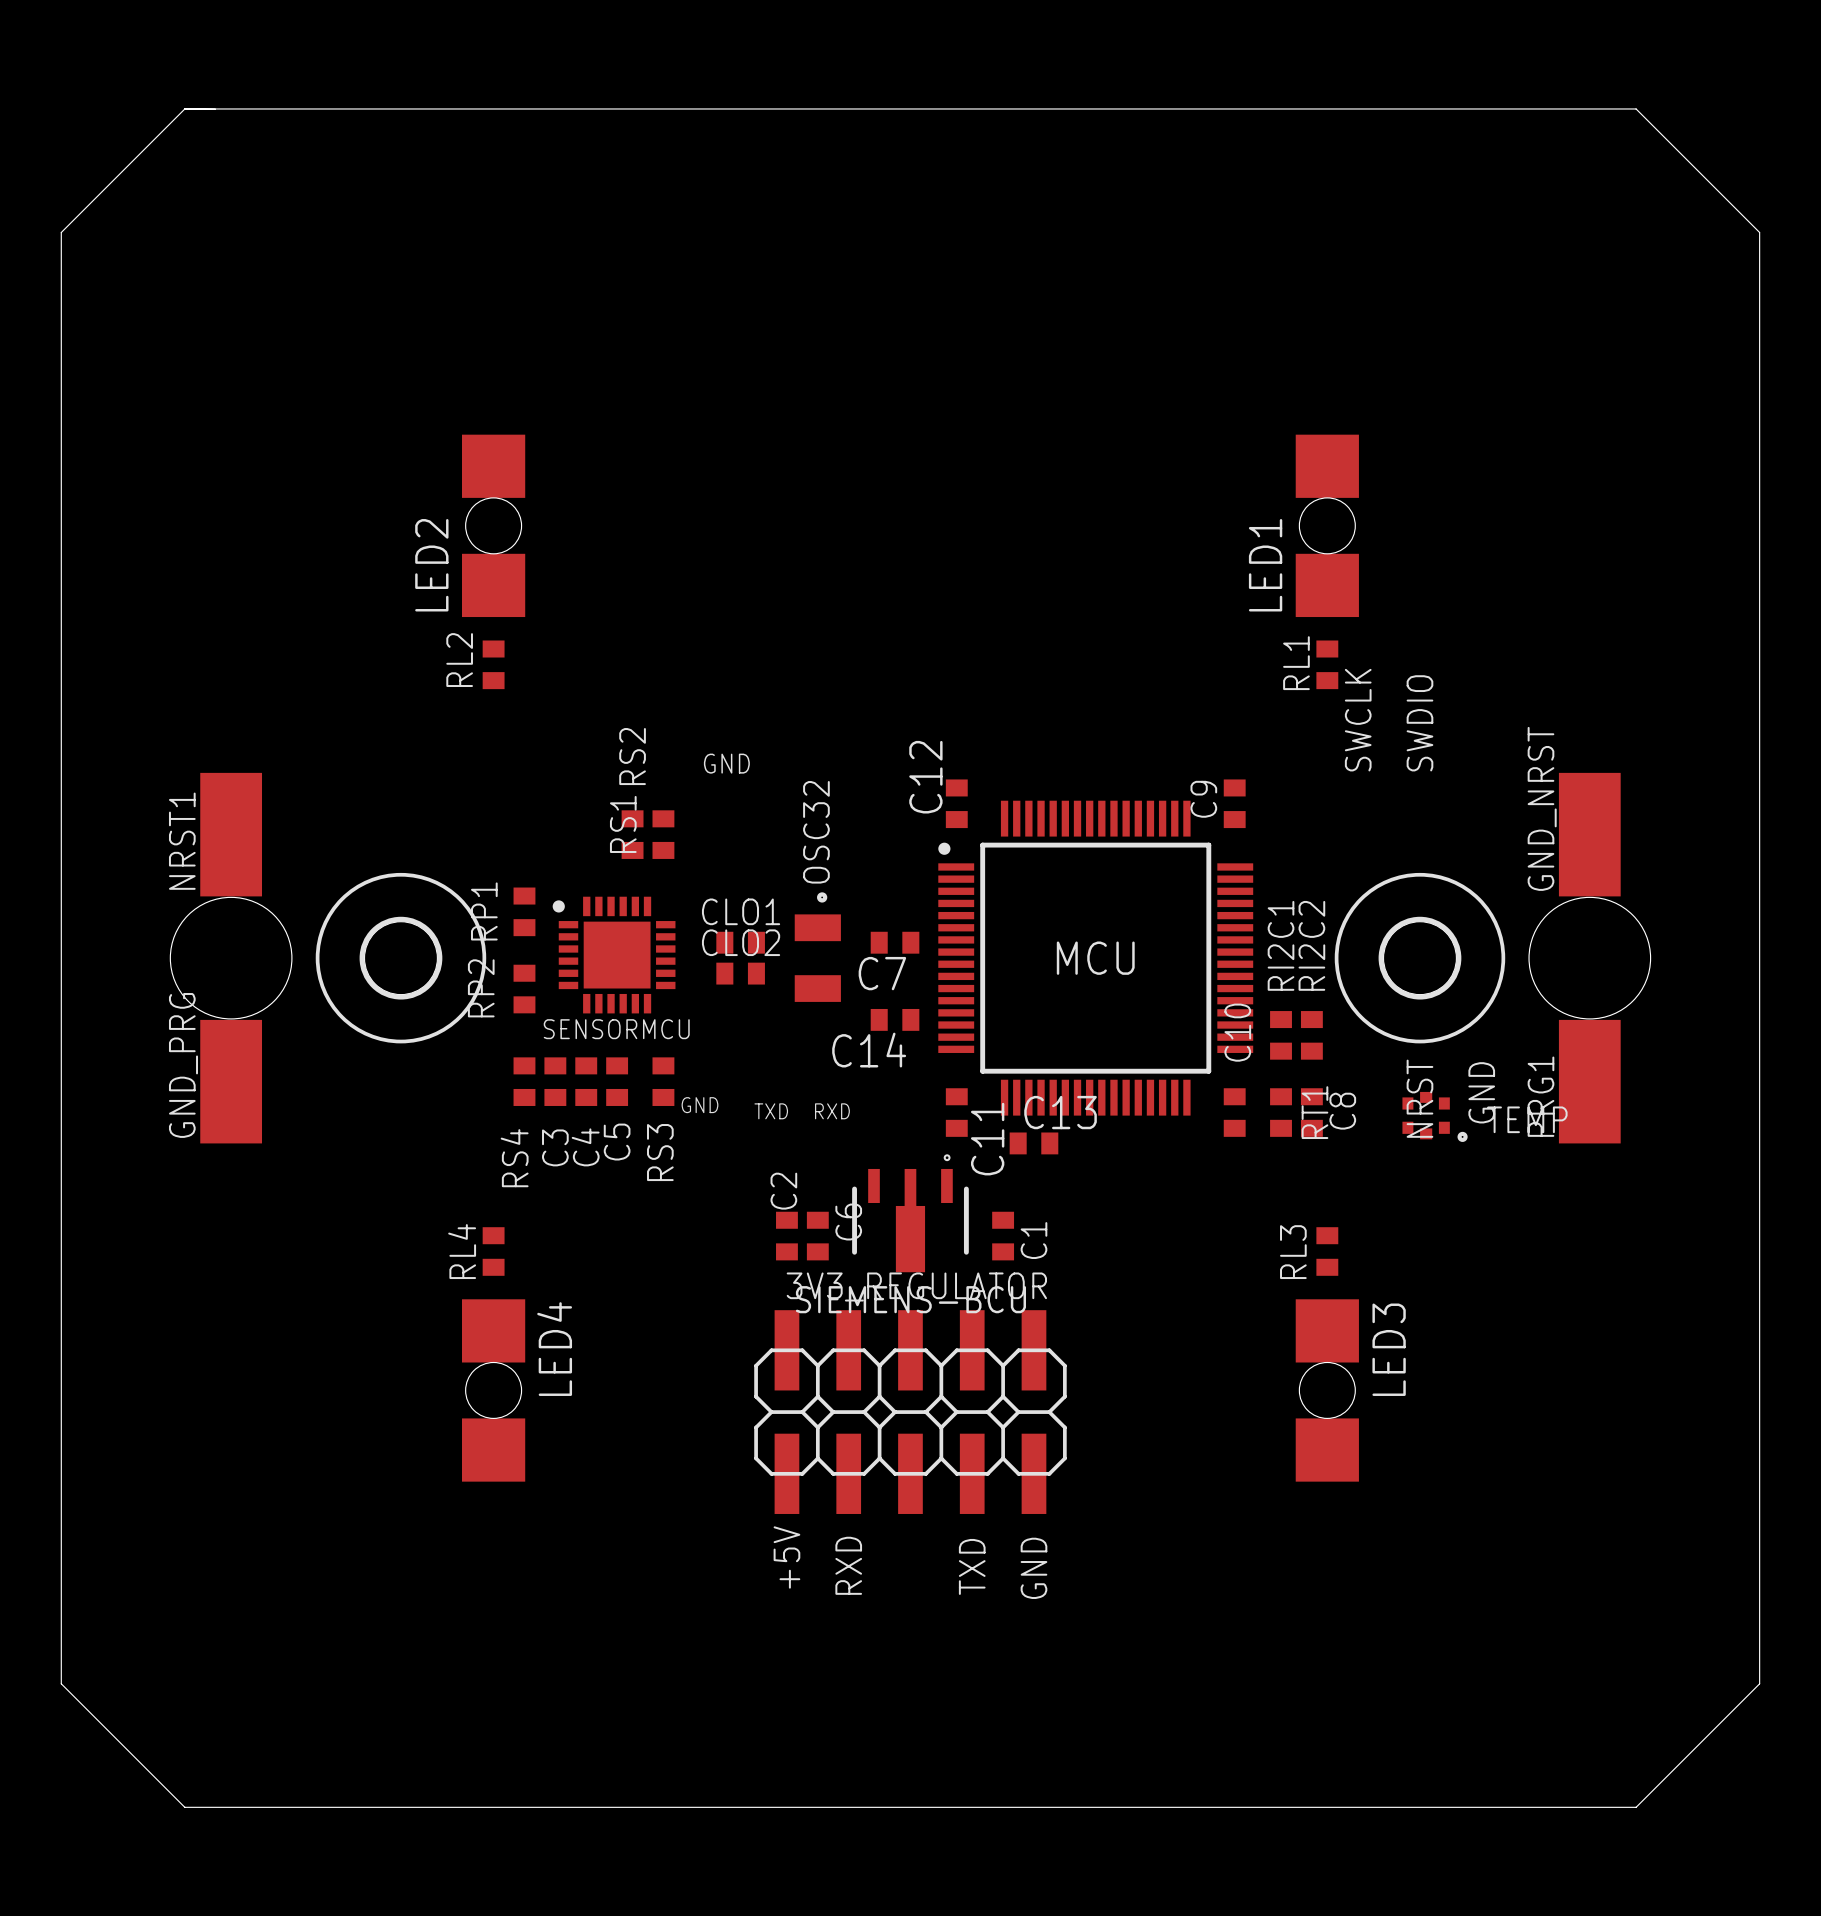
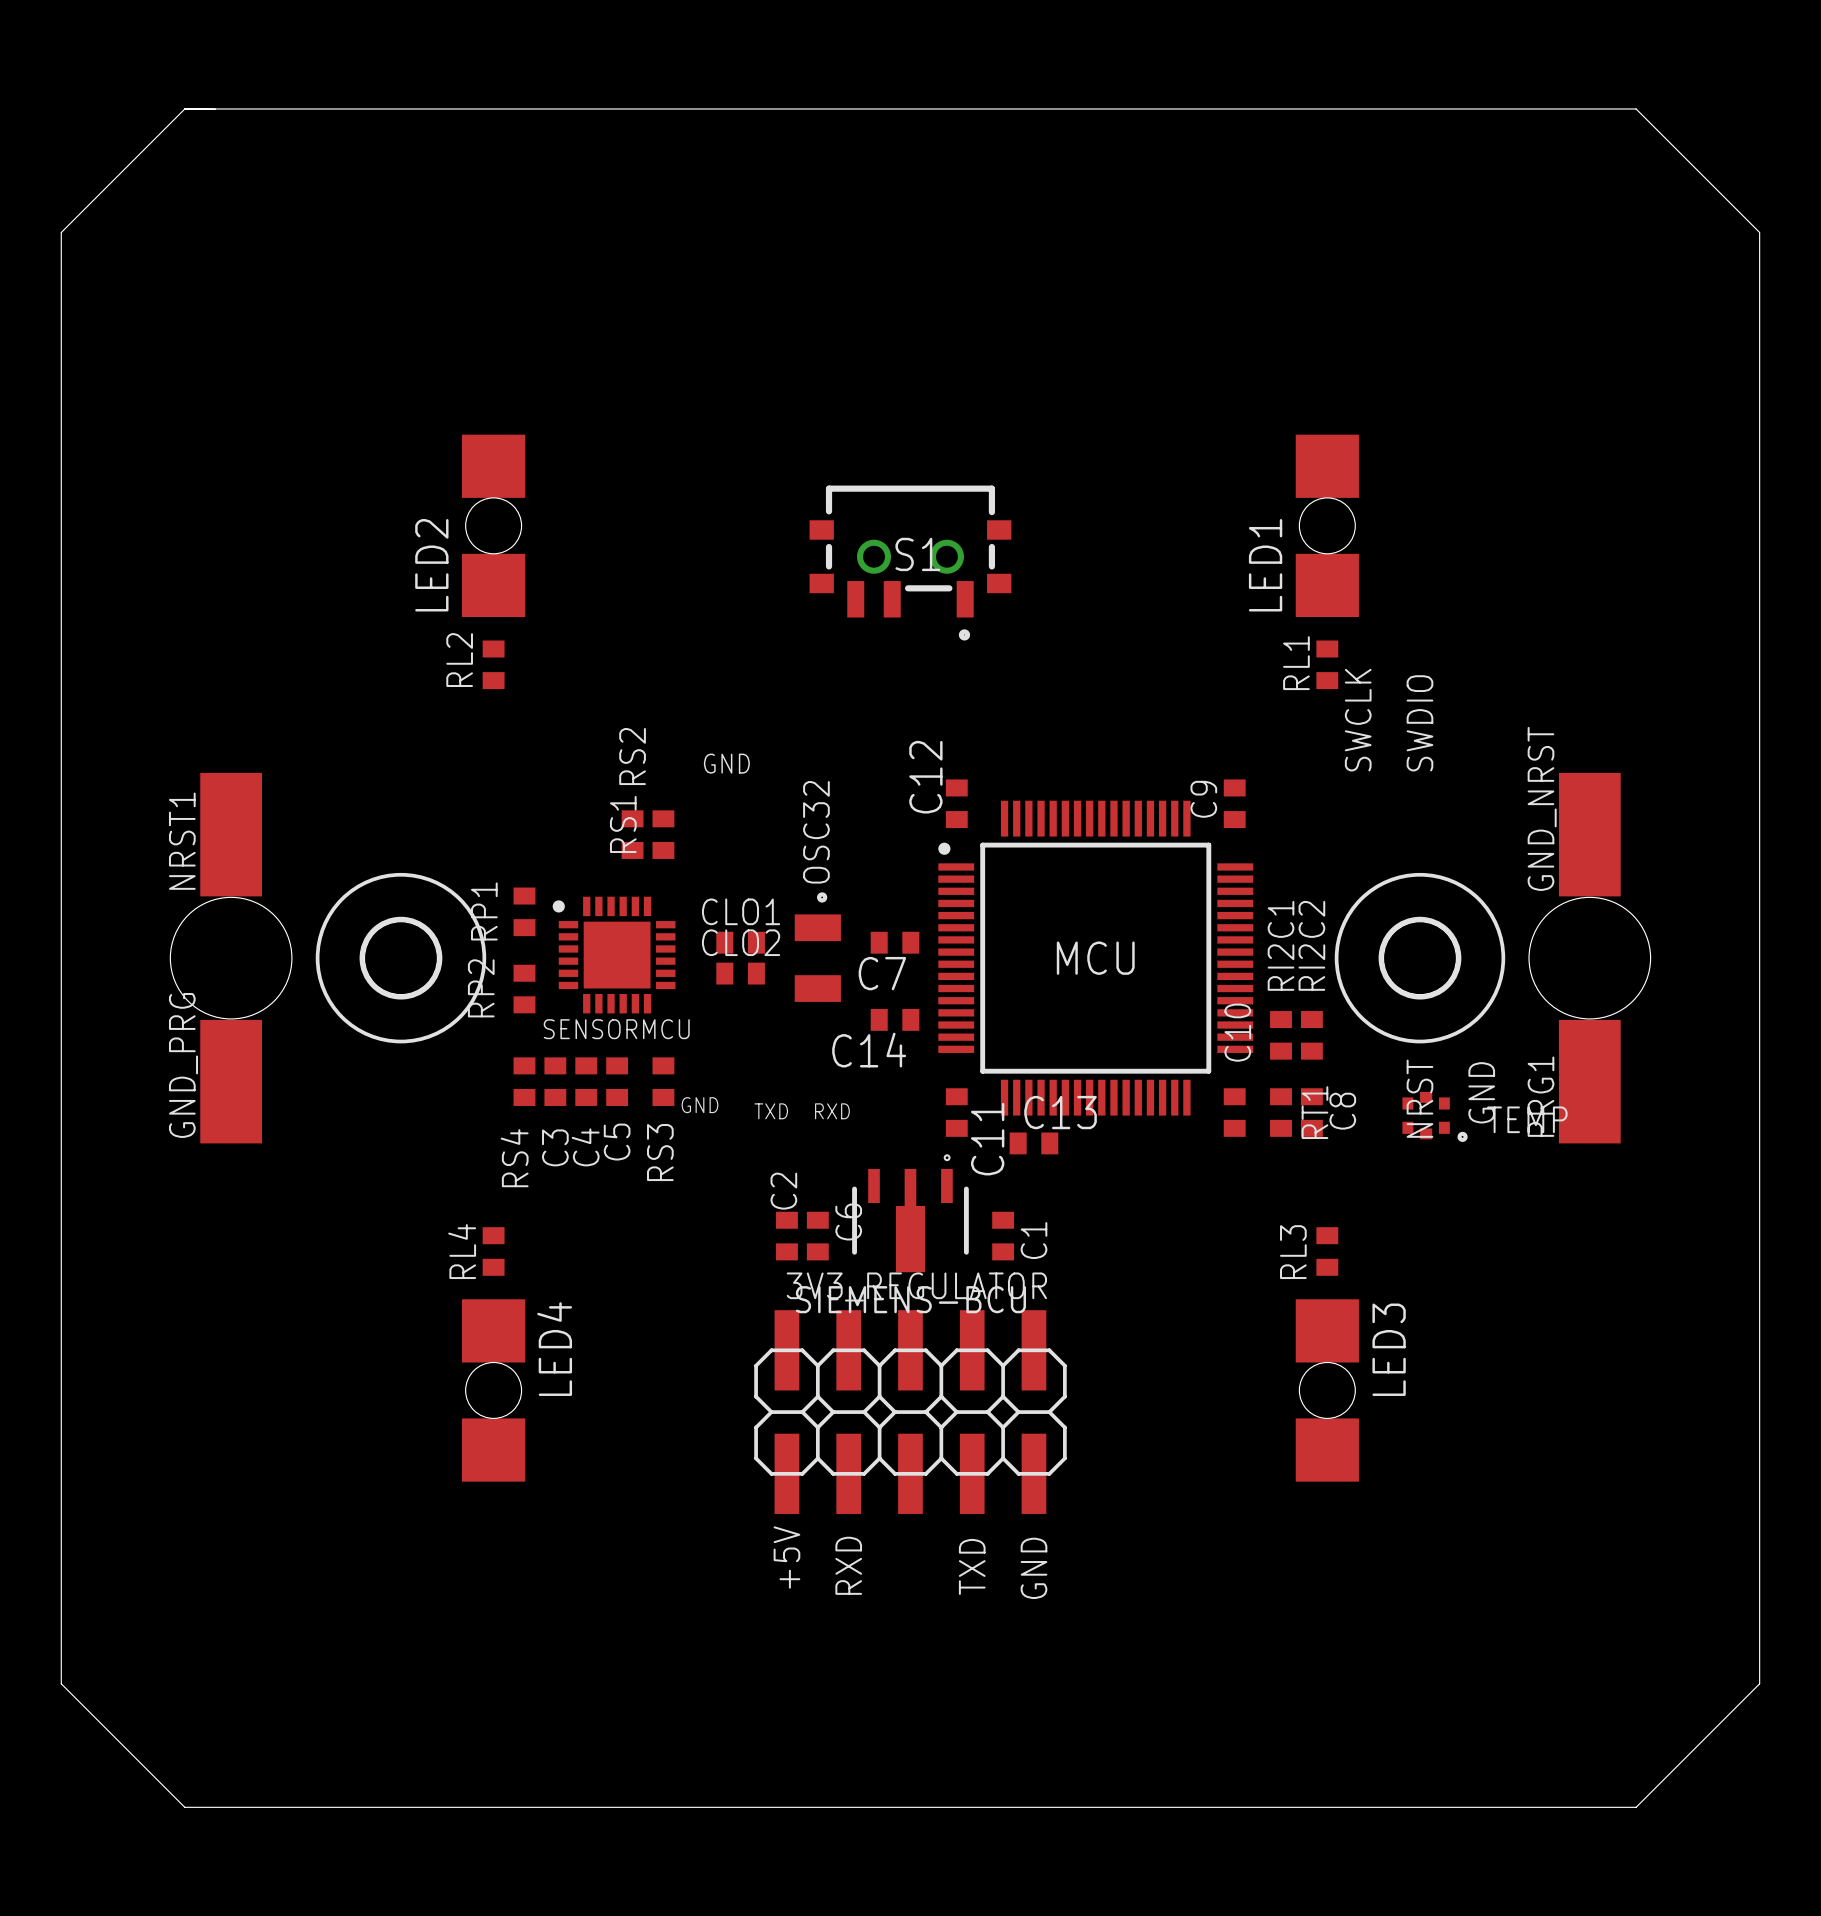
S1: none -> (910, 563)

